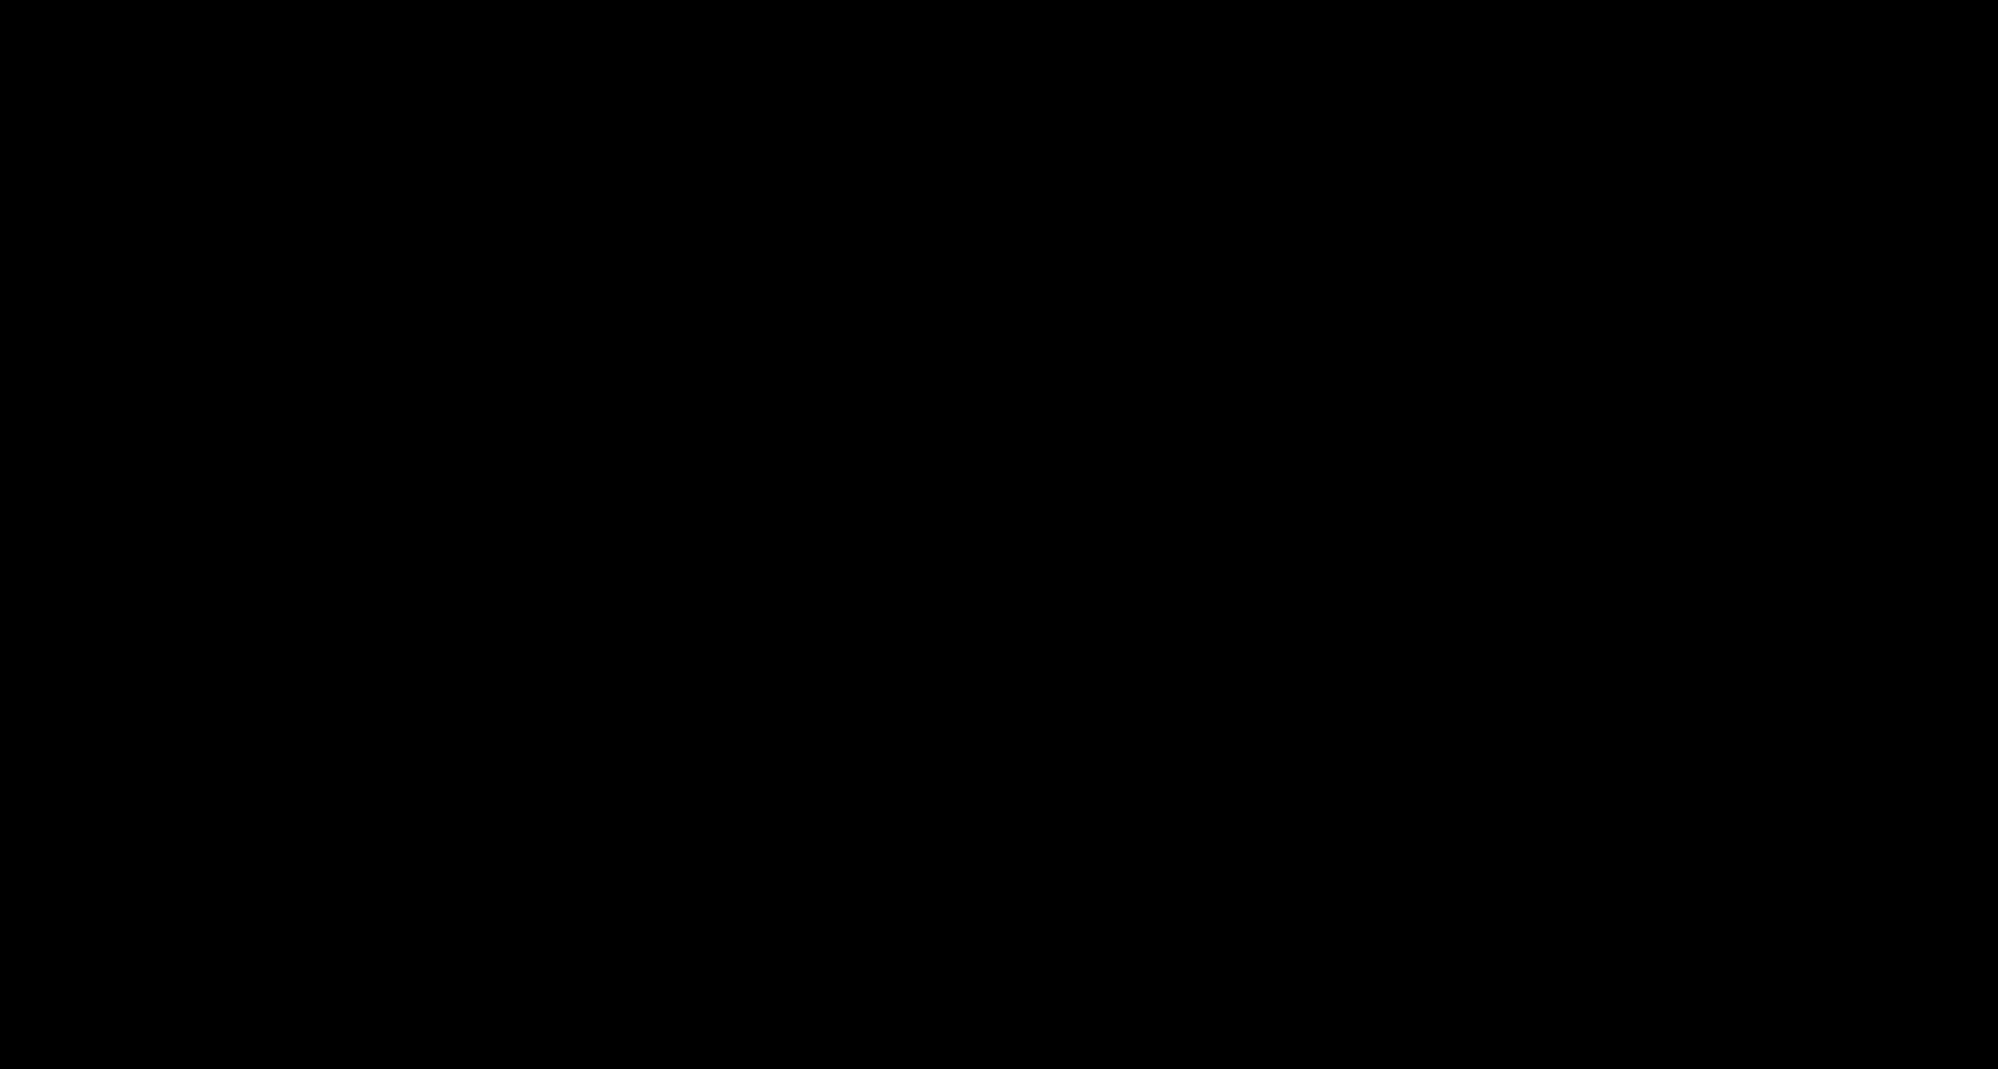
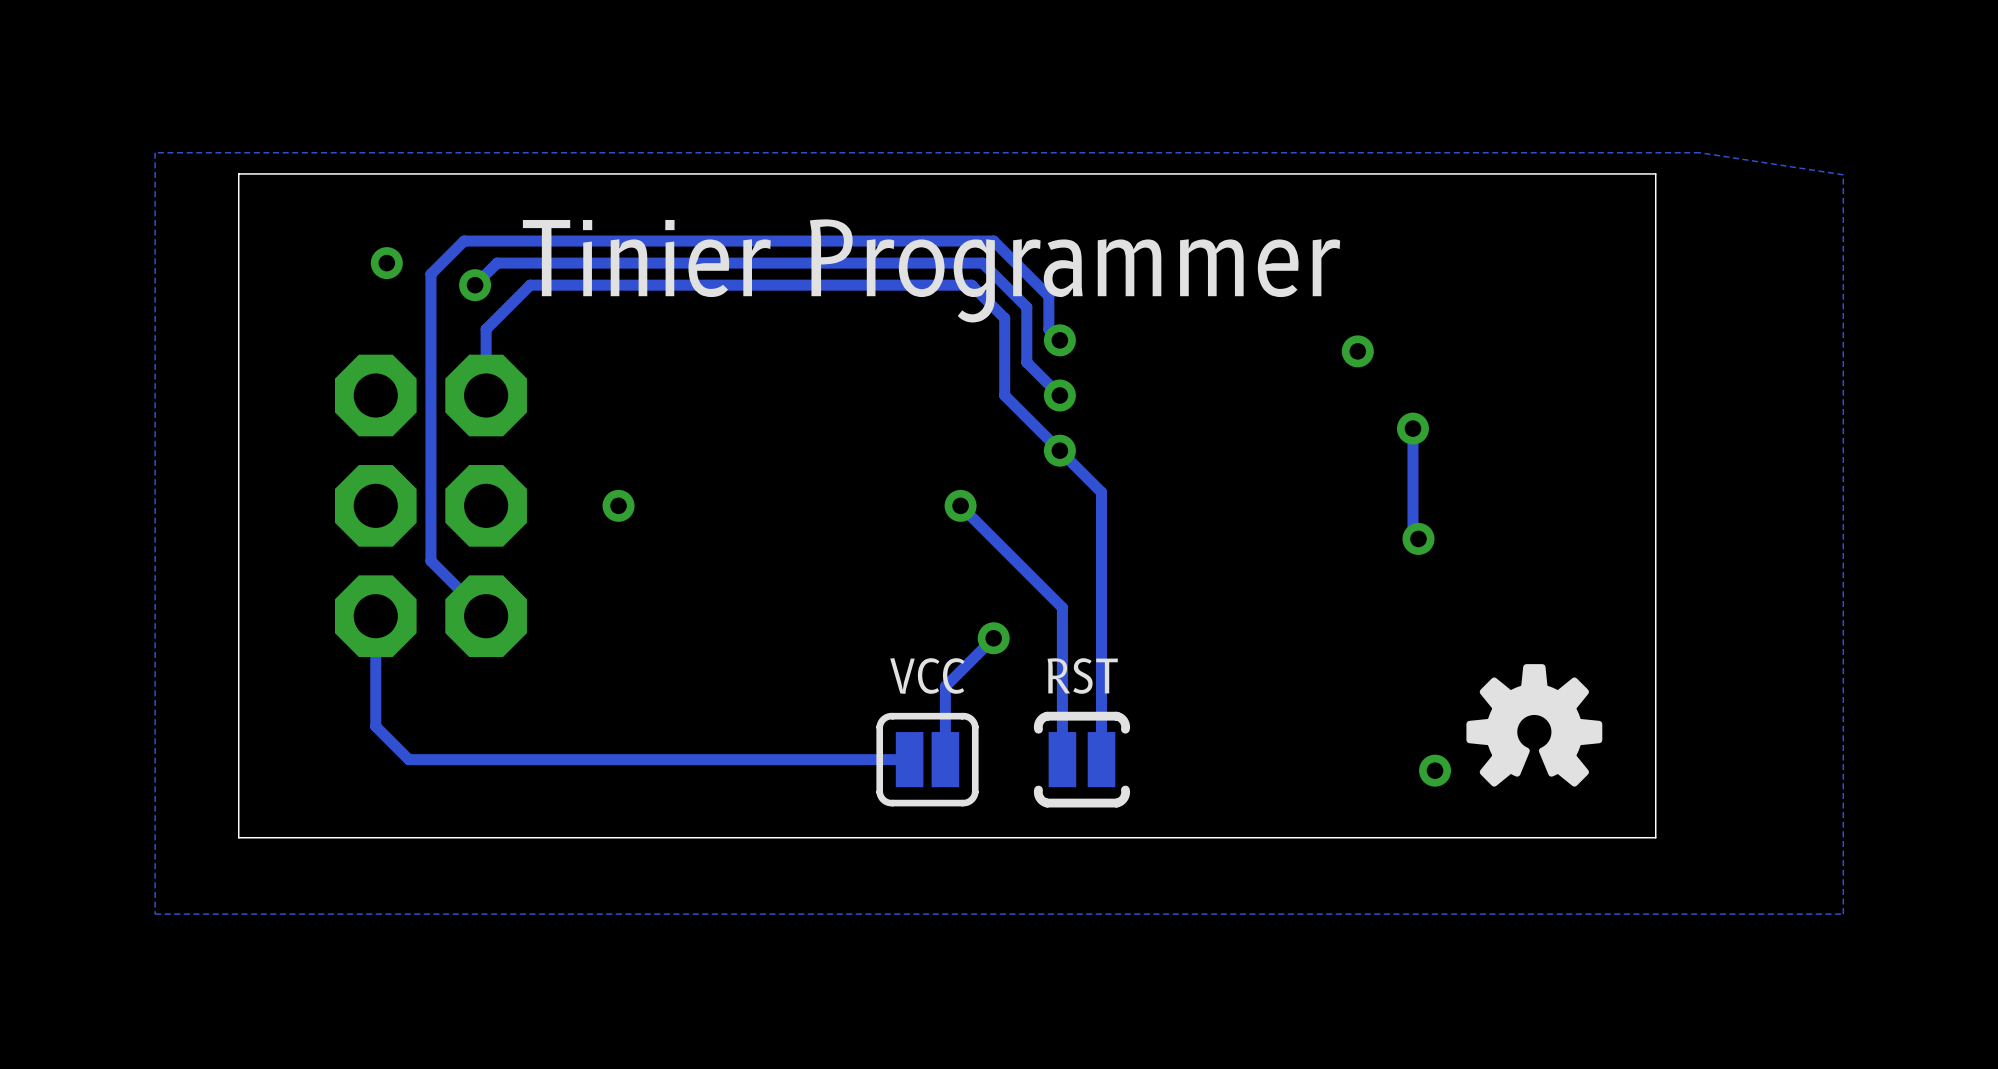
zone outline: none -> (1699, 152) (155, 152) (155, 914) (1843, 914) (1843, 174) (1699, 152)
board edge: none -> (1655, 173) (1655, 837) (238, 837) (238, 173) (1655, 173)
via: none -> (386, 263)
text: none -> Tinier Programmer (931, 270)
track: none -> (475, 285) (497, 263) (982, 263) (1026, 307) (1026, 362) (1059, 395)
via: none -> (475, 285)
track: none -> (1059, 340) (1048, 329) (1048, 296) (993, 241) (464, 241) (430, 274) (430, 561) (486, 616)
via: none -> (1059, 340)
via: none -> (1357, 351)
track: none -> (486, 395) (486, 329) (530, 285) (971, 285) (1004, 318) (1004, 395) (1101, 492) (1101, 759)
via: none -> (1059, 395)
track: none -> (1412, 428) (1412, 533) (1418, 538)
via: none -> (1412, 428)
via: none -> (1059, 450)
part: none -> (430, 505)
via: none -> (618, 505)
track: none -> (960, 505) (1062, 607) (1062, 759)
via: none -> (960, 505)
via: none -> (1418, 538)
track: none -> (375, 616) (375, 726) (408, 759) (909, 759)
track: none -> (993, 638) (945, 686) (945, 759)
via: none -> (993, 638)
drawing: none -> [1466, 664, 1603, 787]
text: none -> VCC (927, 676)
text: none -> RST (1082, 676)
part: none -> (927, 759)
part: none -> (1081, 759)
via: none -> (1435, 770)

